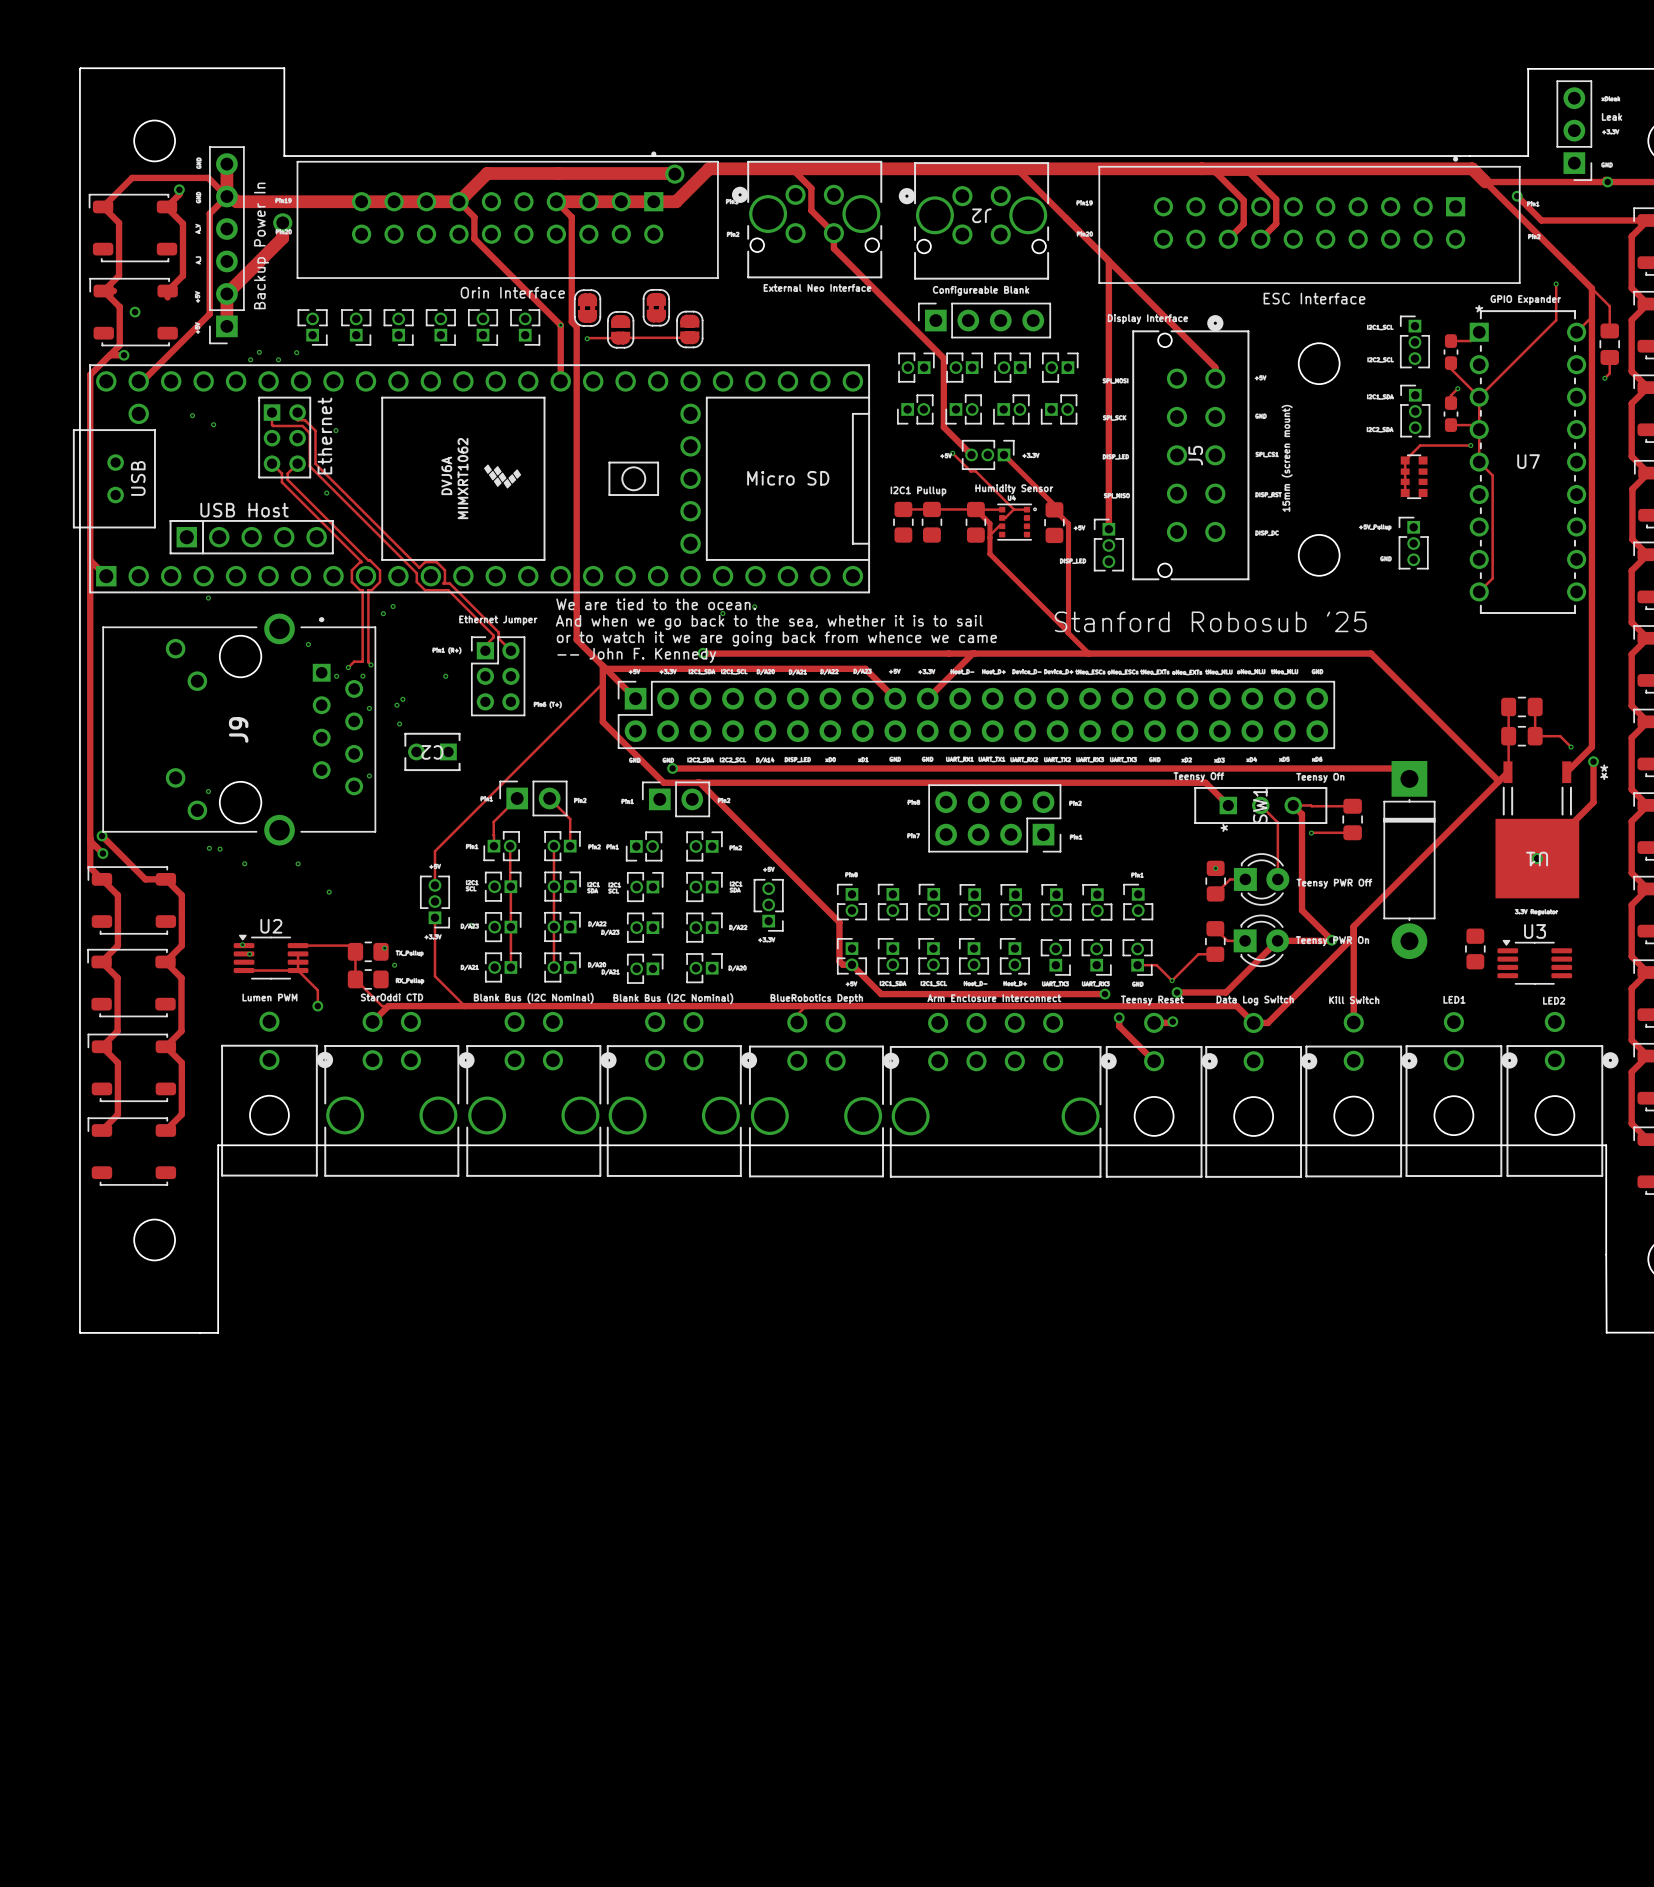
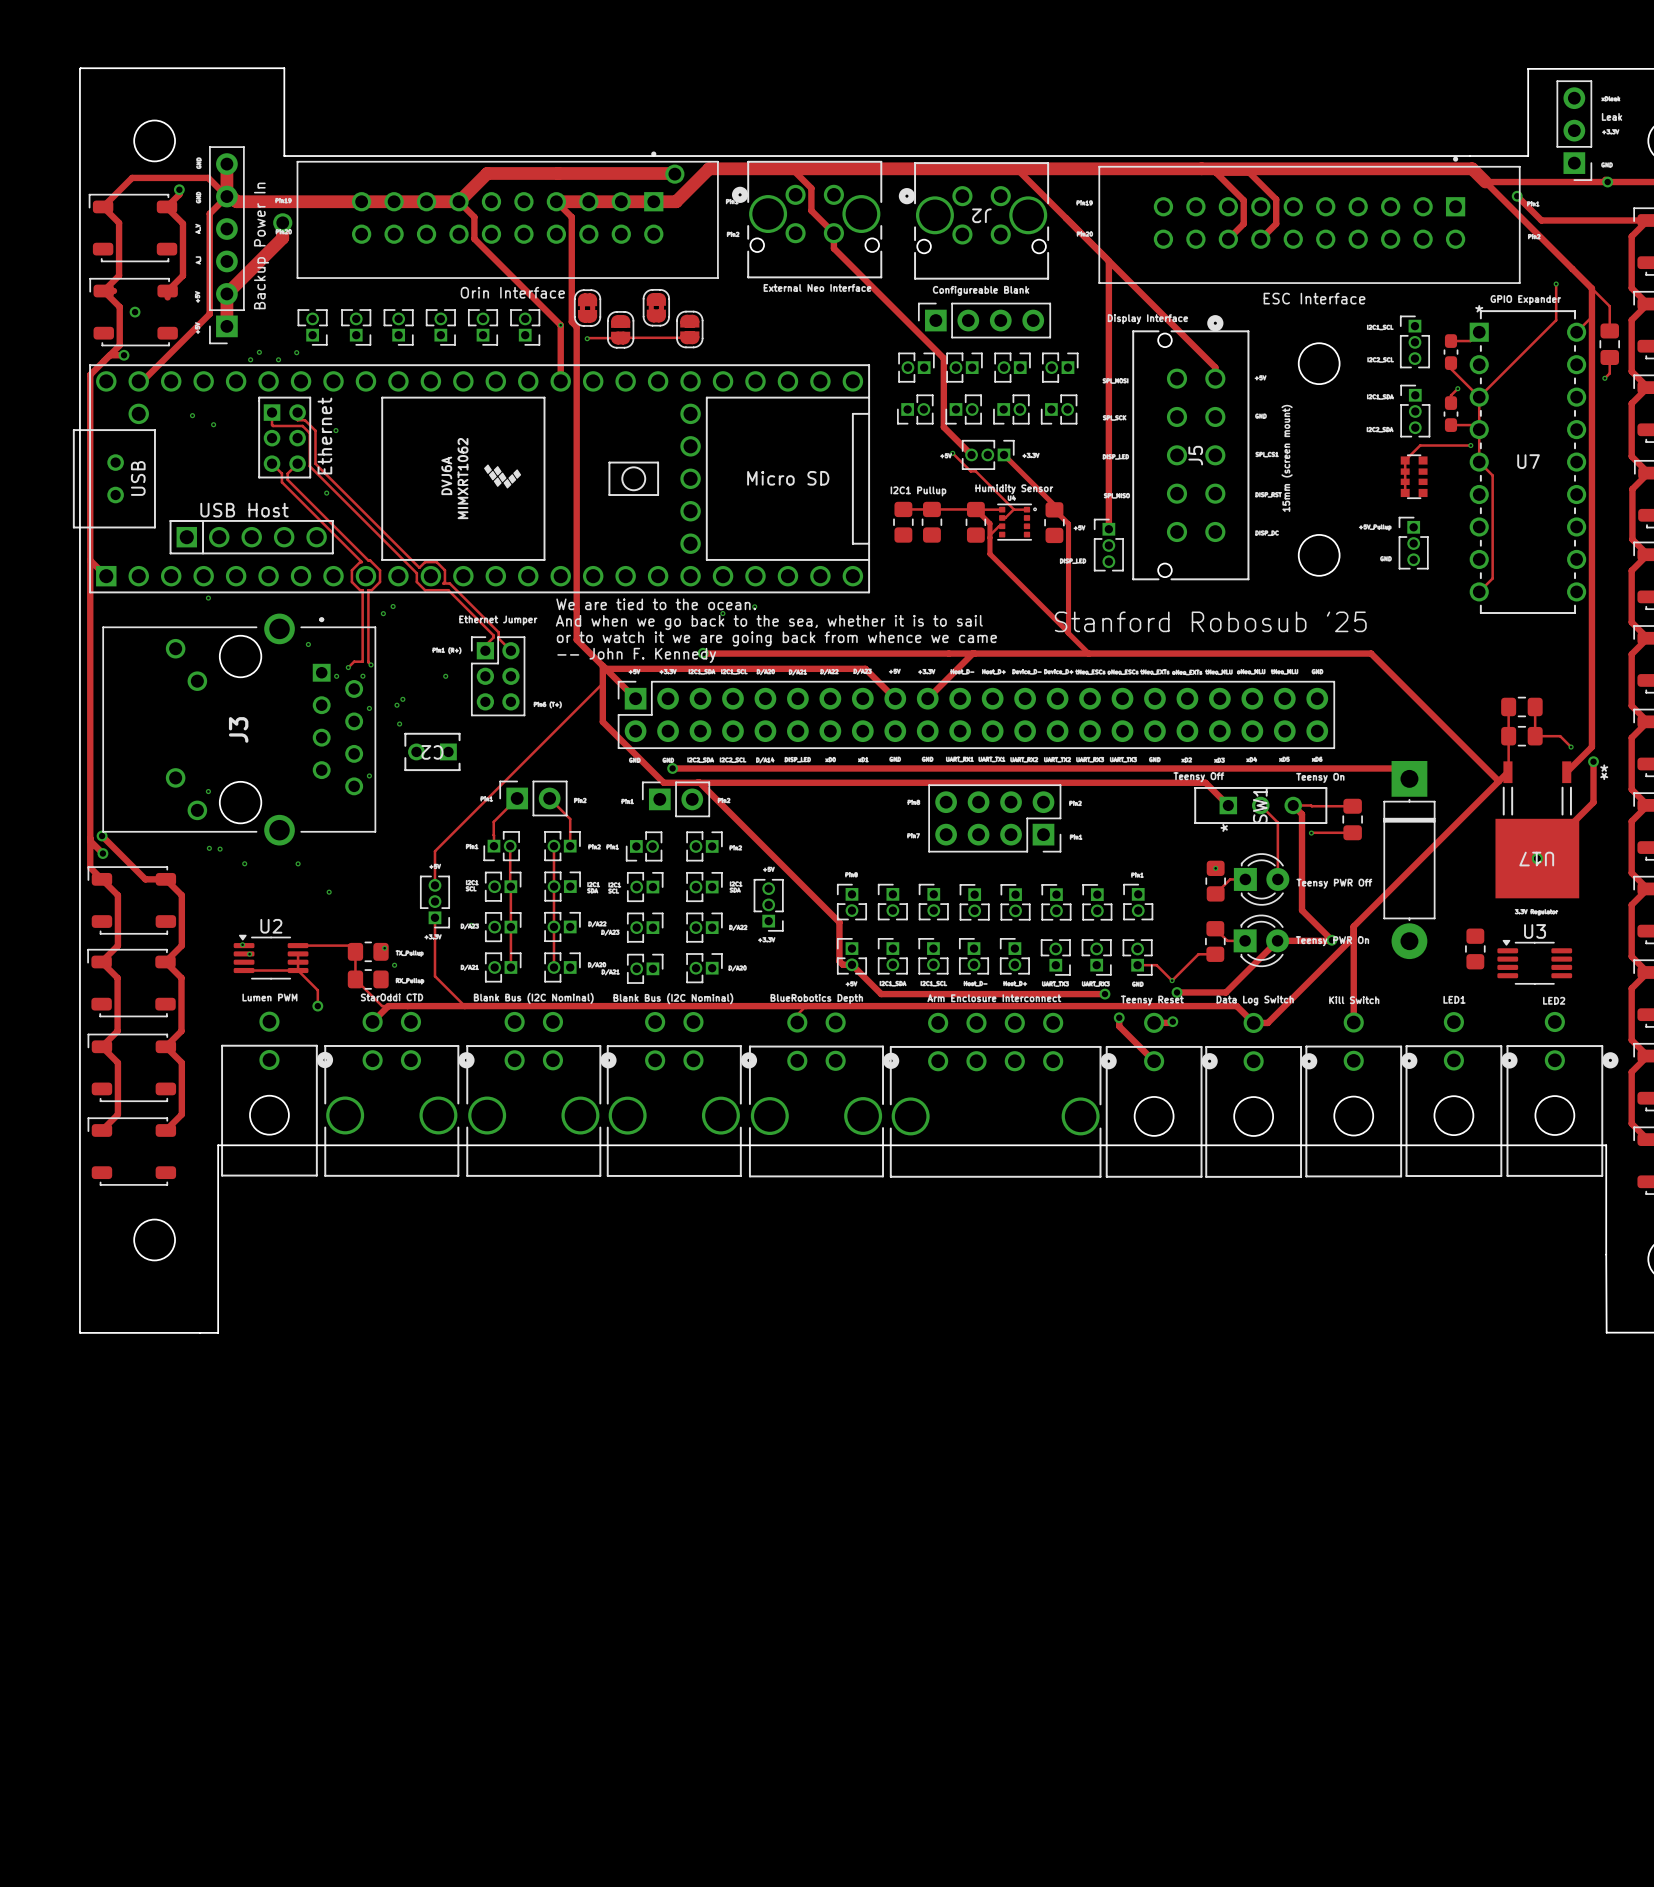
J9 name: J9 (238, 729) -> J3 (238, 729)
U1 name: U1 (1537, 859) -> U17 (1536, 859)

